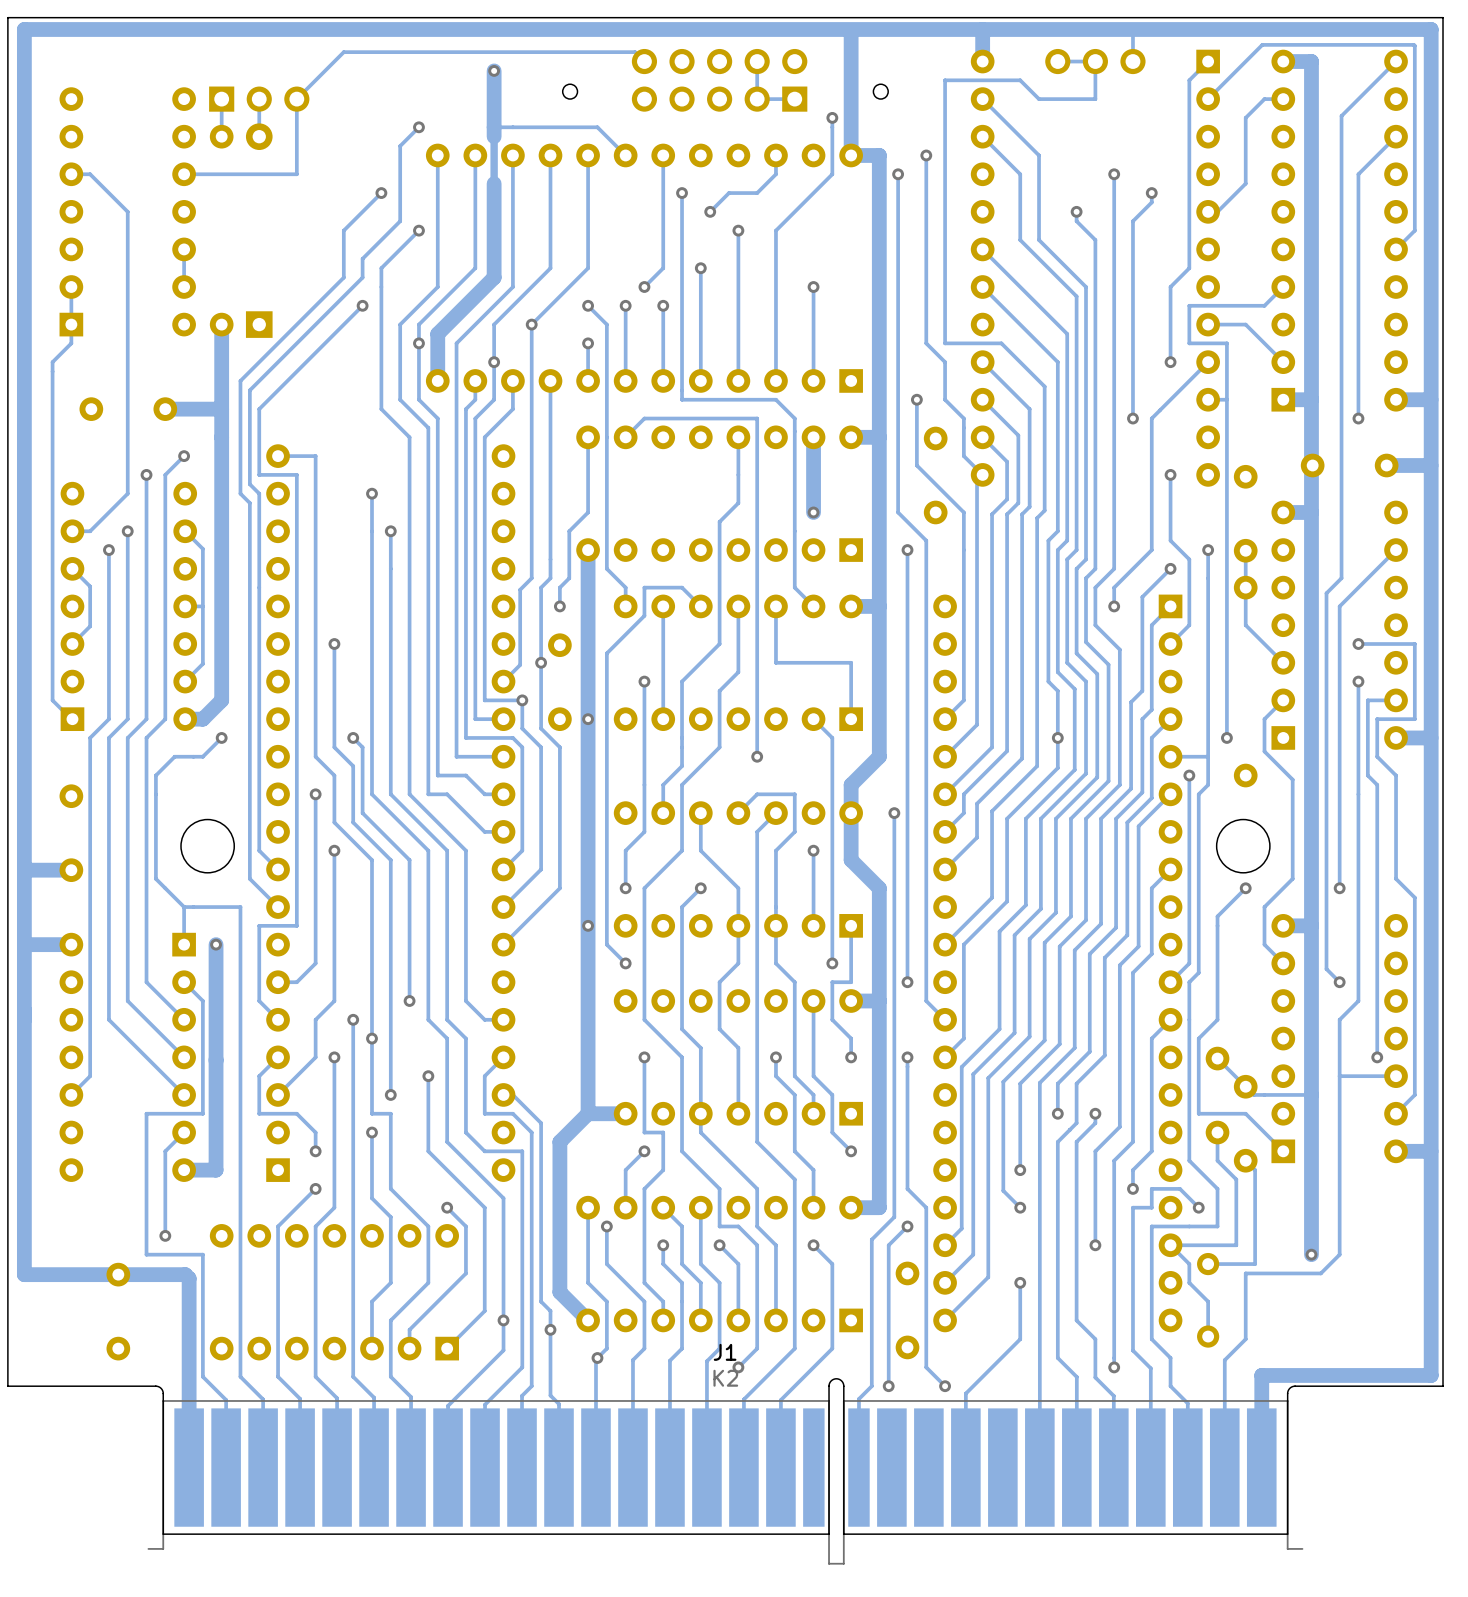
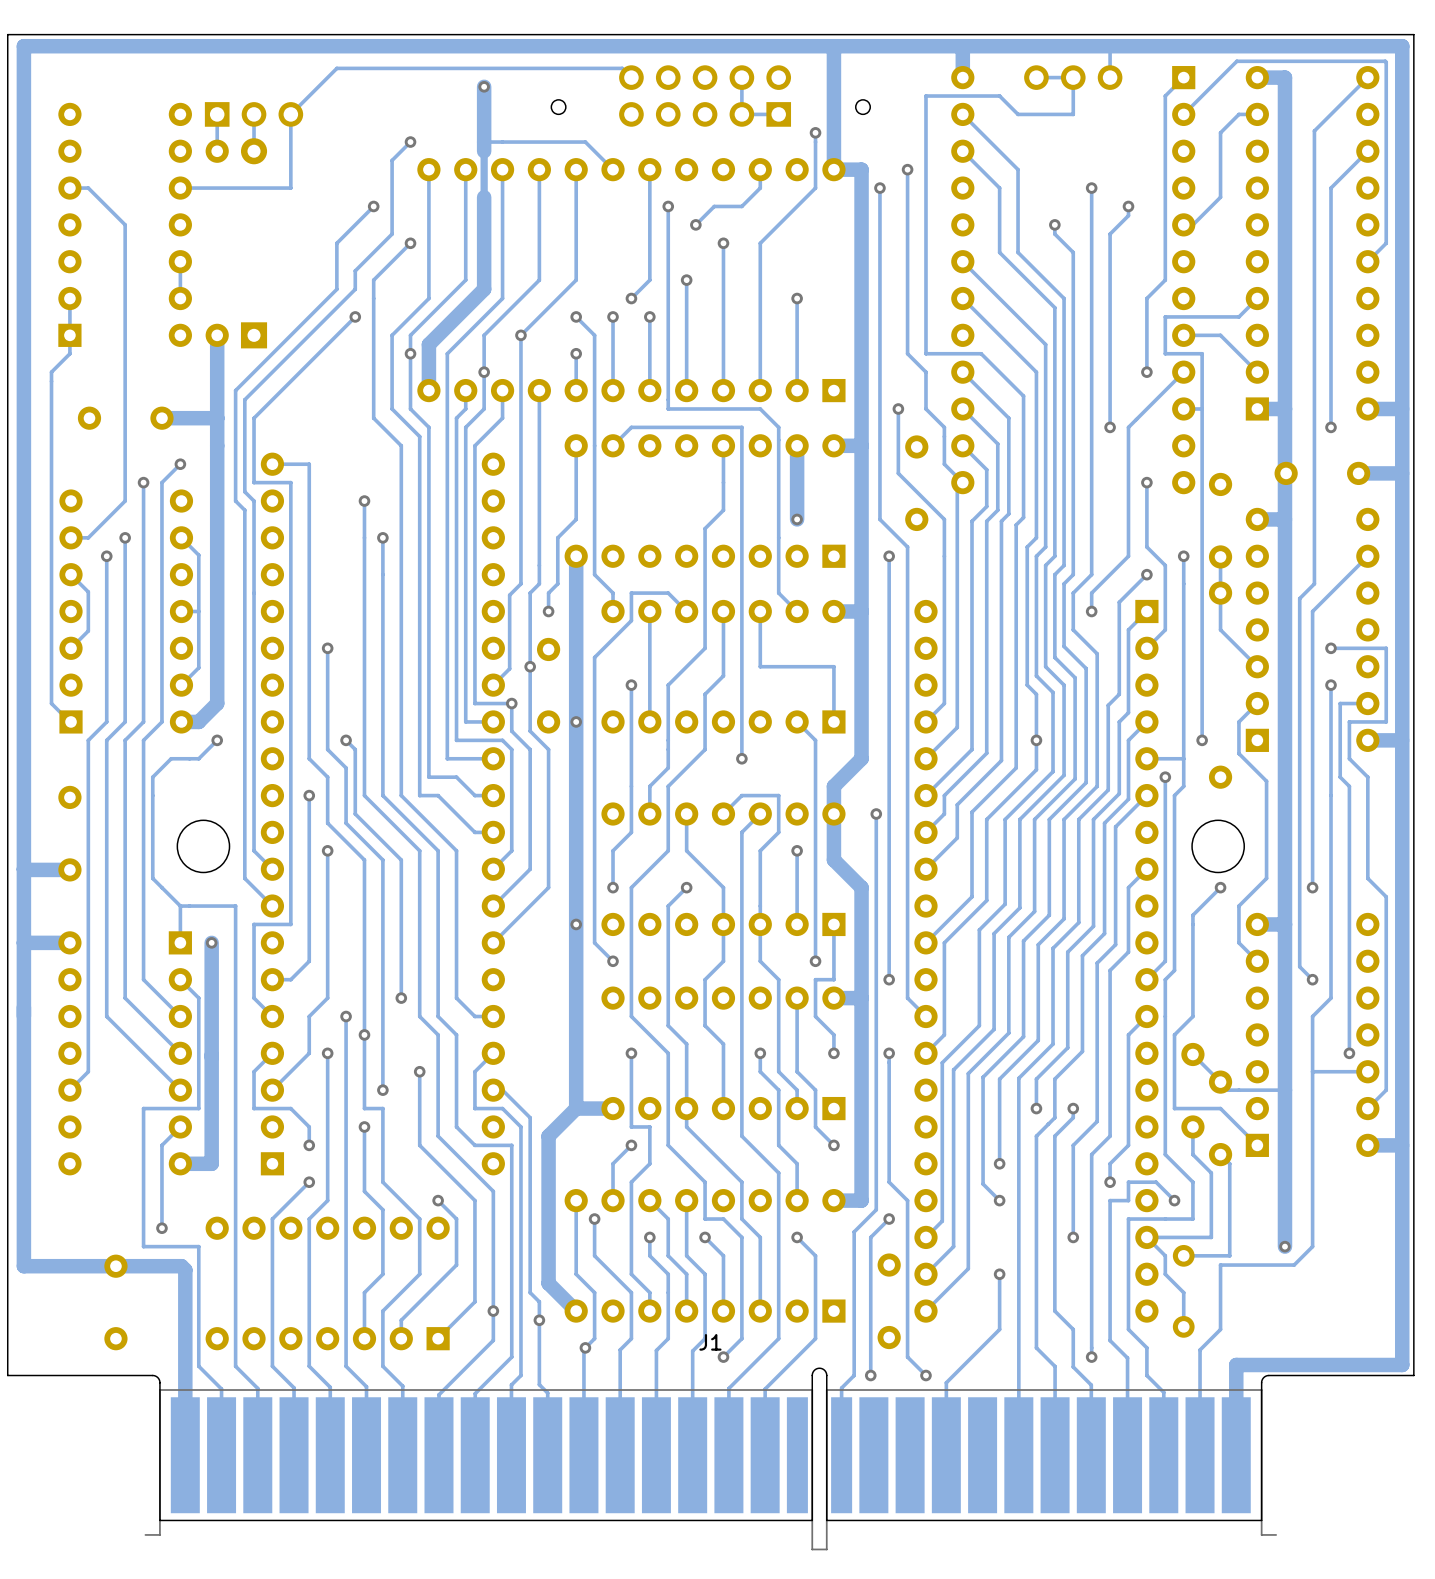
J1 value: K2 (725, 1378) -> none

